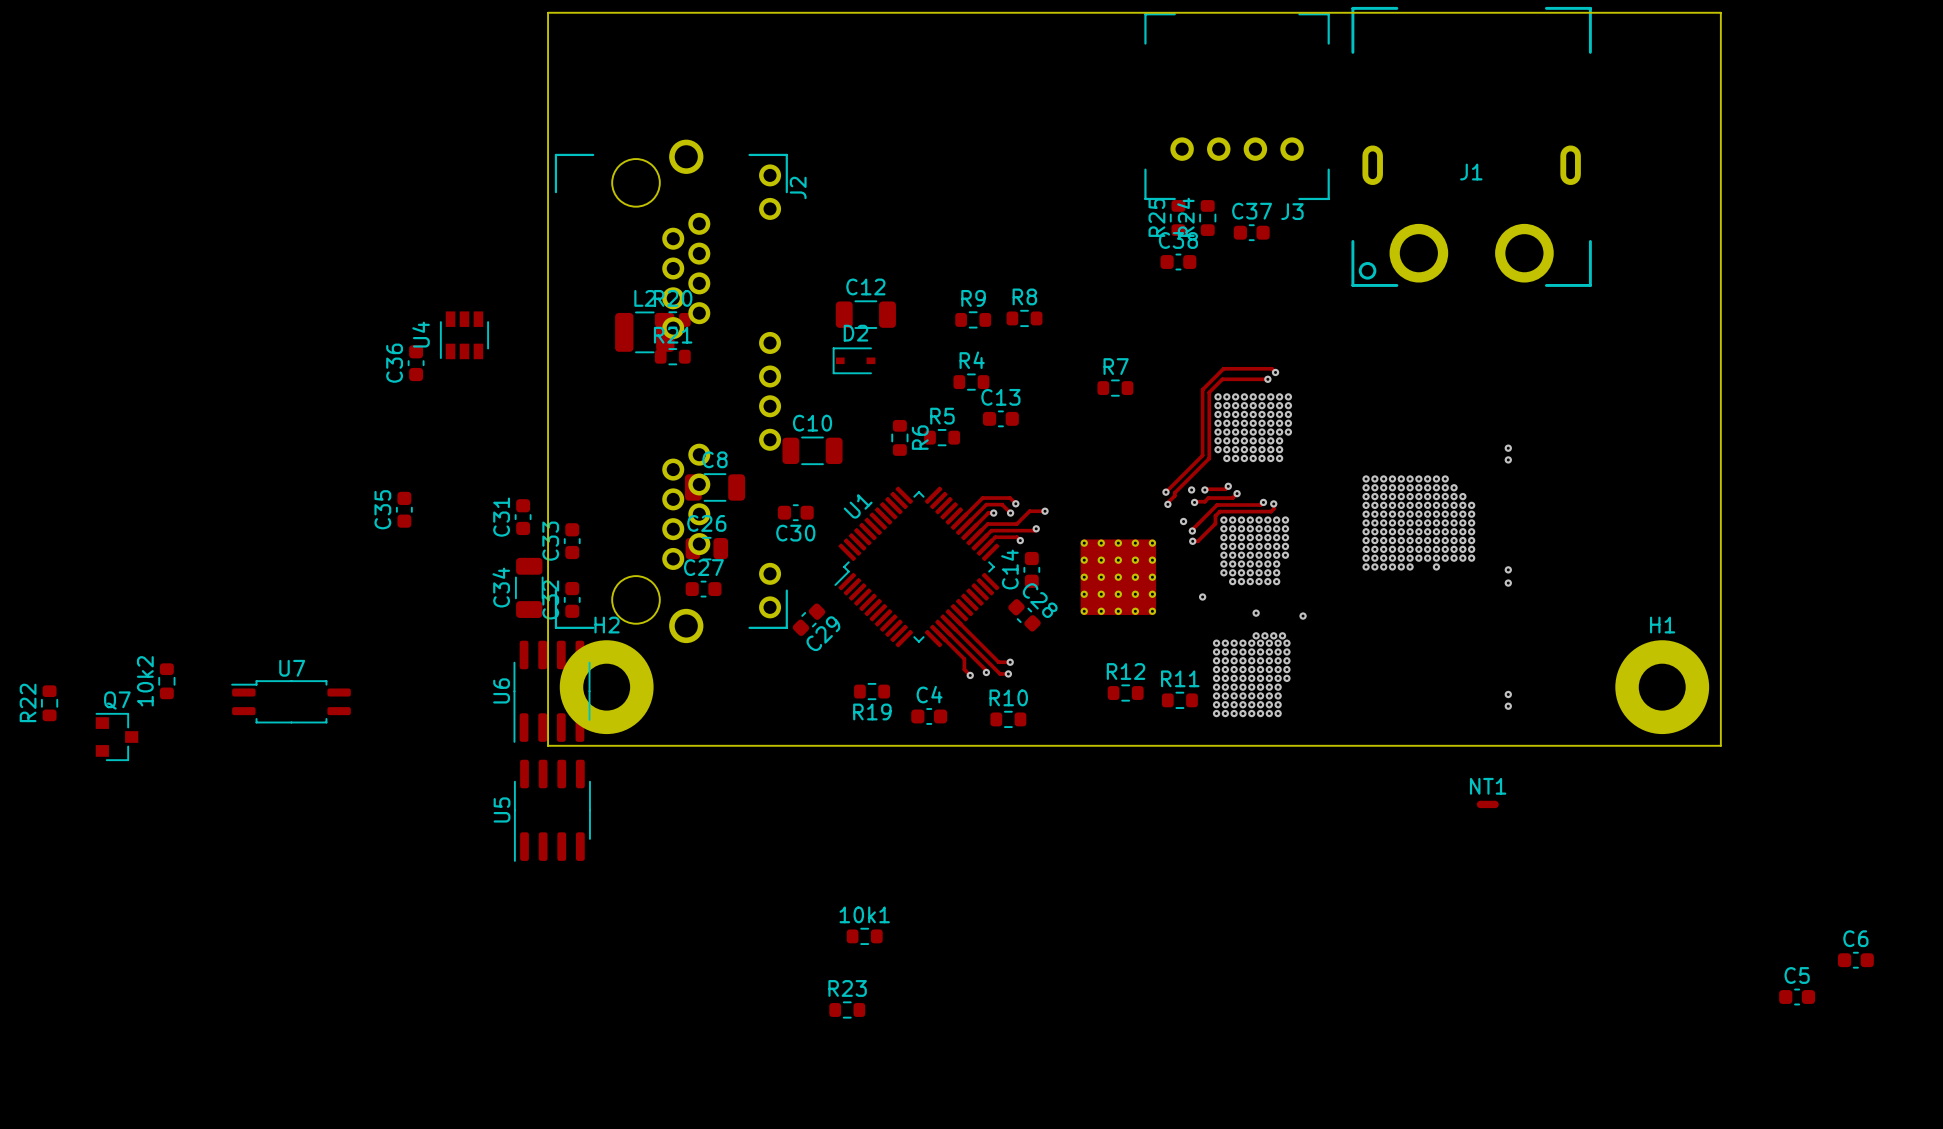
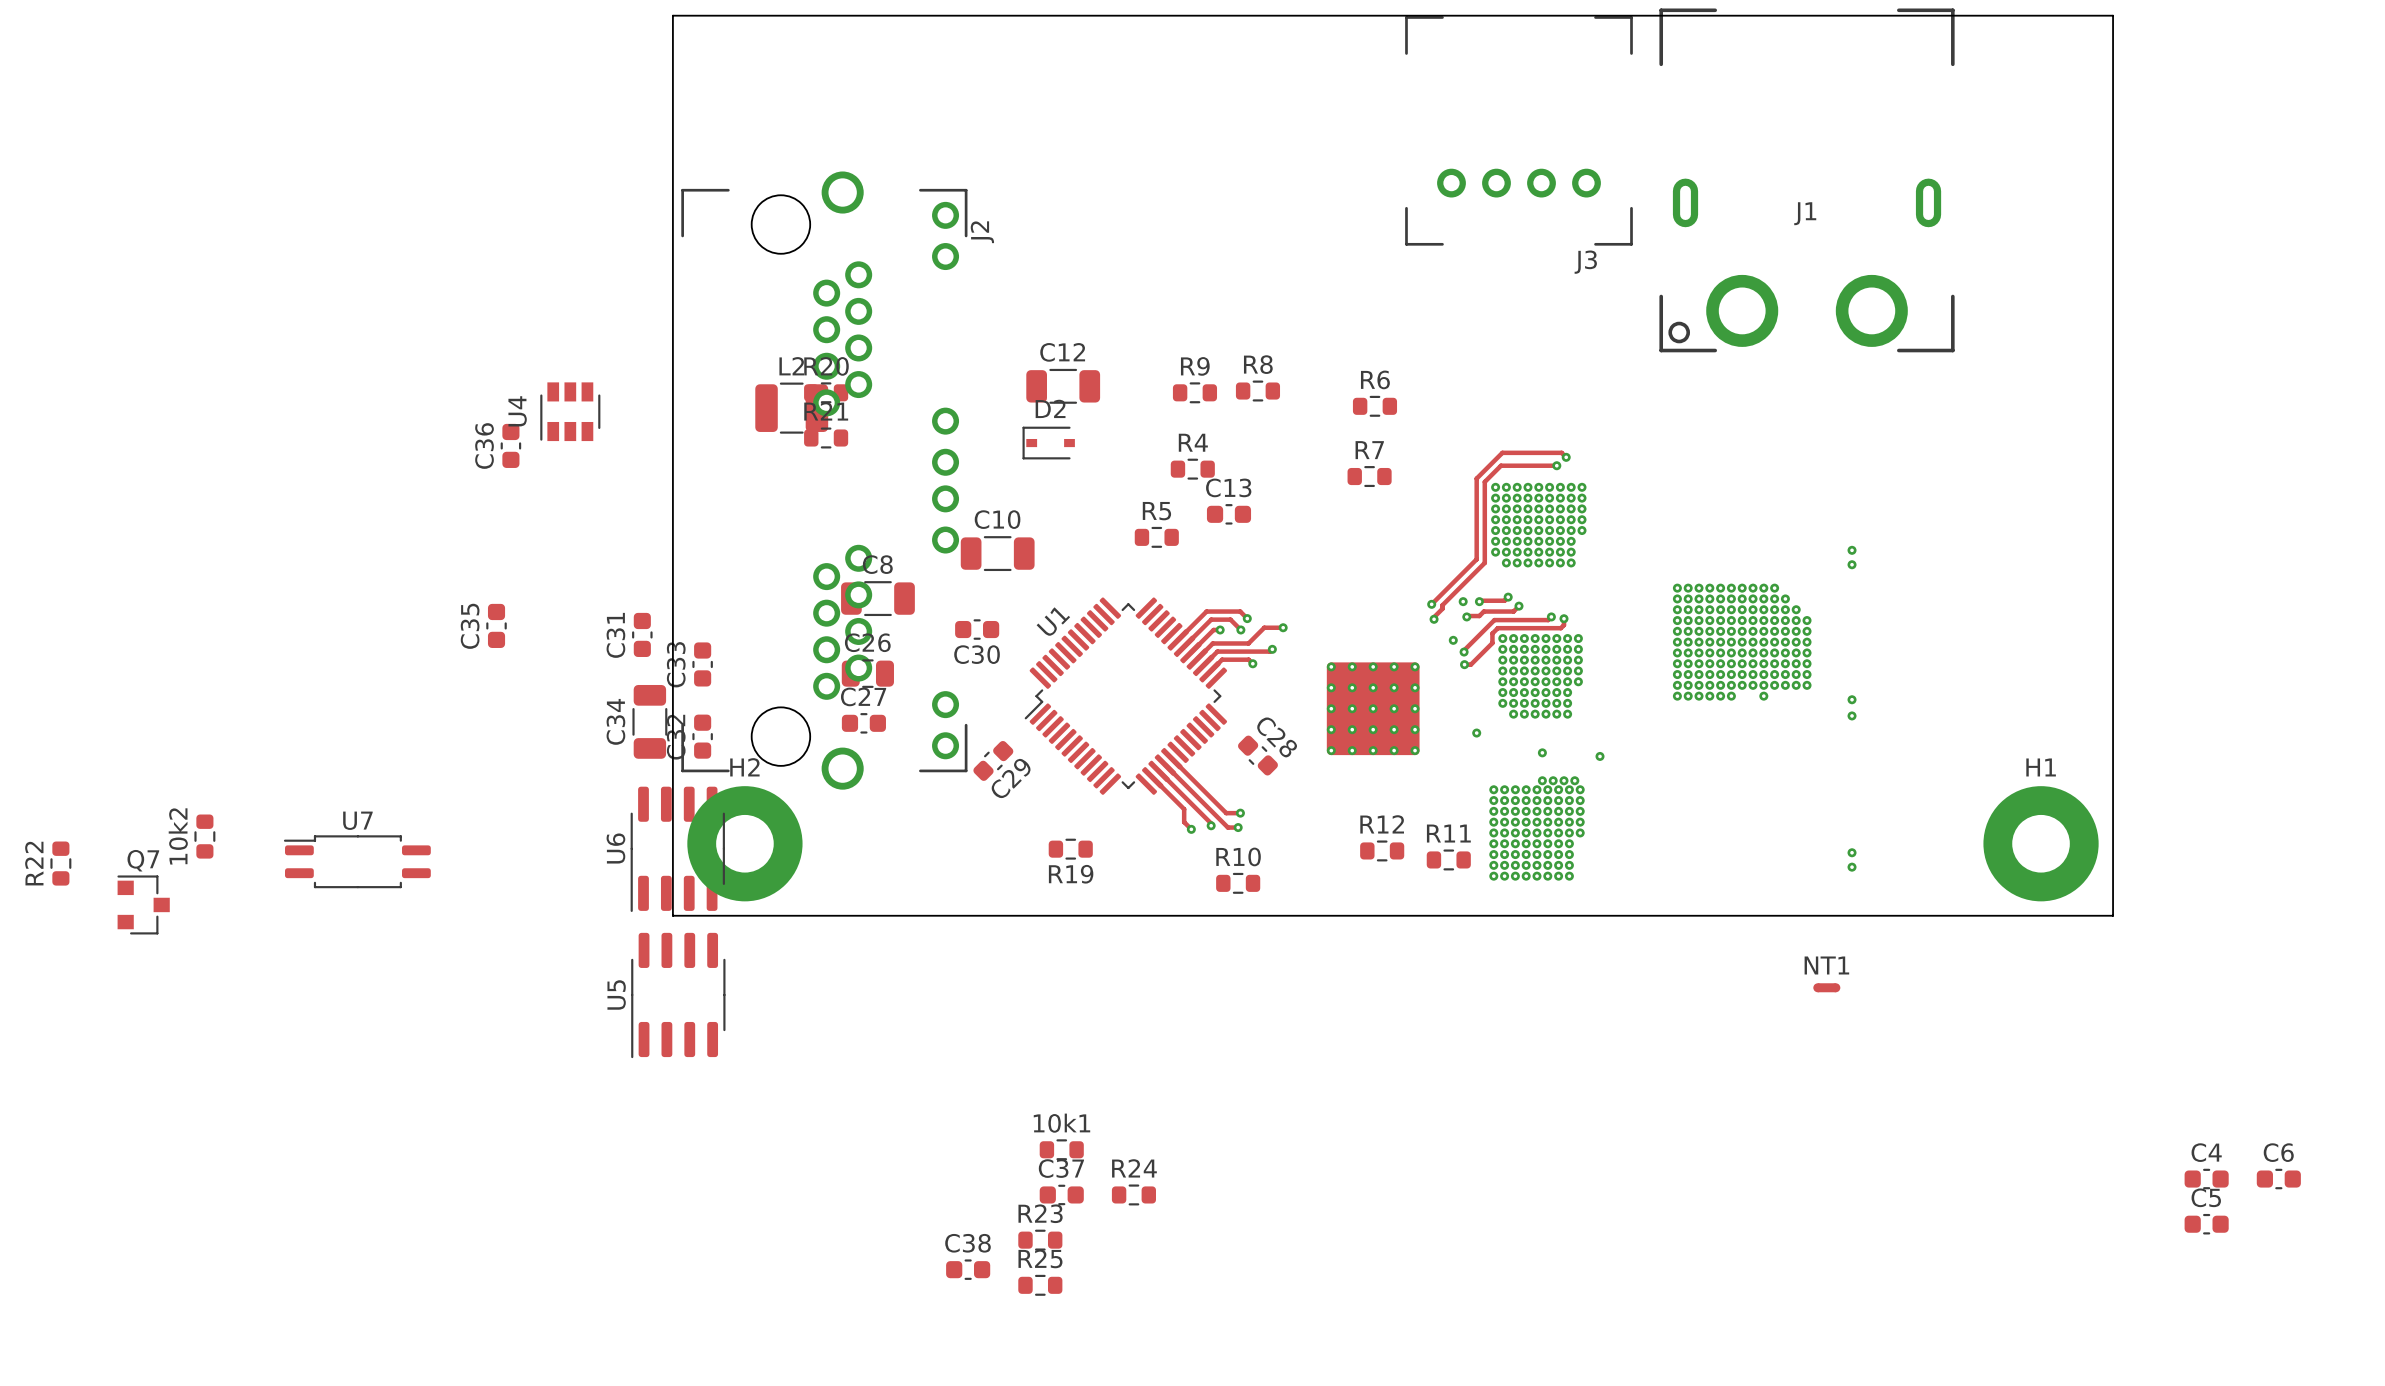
R25 rotation: 0° (1178, 218) -> 90° clockwise (1040, 1285)
R25 position: (1178, 218) -> (1040, 1285)
R24 rotation: 0° (1207, 218) -> 90° clockwise (1133, 1194)
R24 position: (1207, 218) -> (1133, 1194)
C37 position: (1251, 232) -> (1061, 1194)
C38 position: (1178, 262) -> (968, 1269)
R6 rotation: 0° (899, 437) -> 90° clockwise (1374, 406)
R6 position: (899, 437) -> (1374, 406)
R6 name position: R6 (920, 437) -> R6 (1375, 379)
C14: (1031, 569) -> none
C4 position: (929, 716) -> (2206, 1179)

